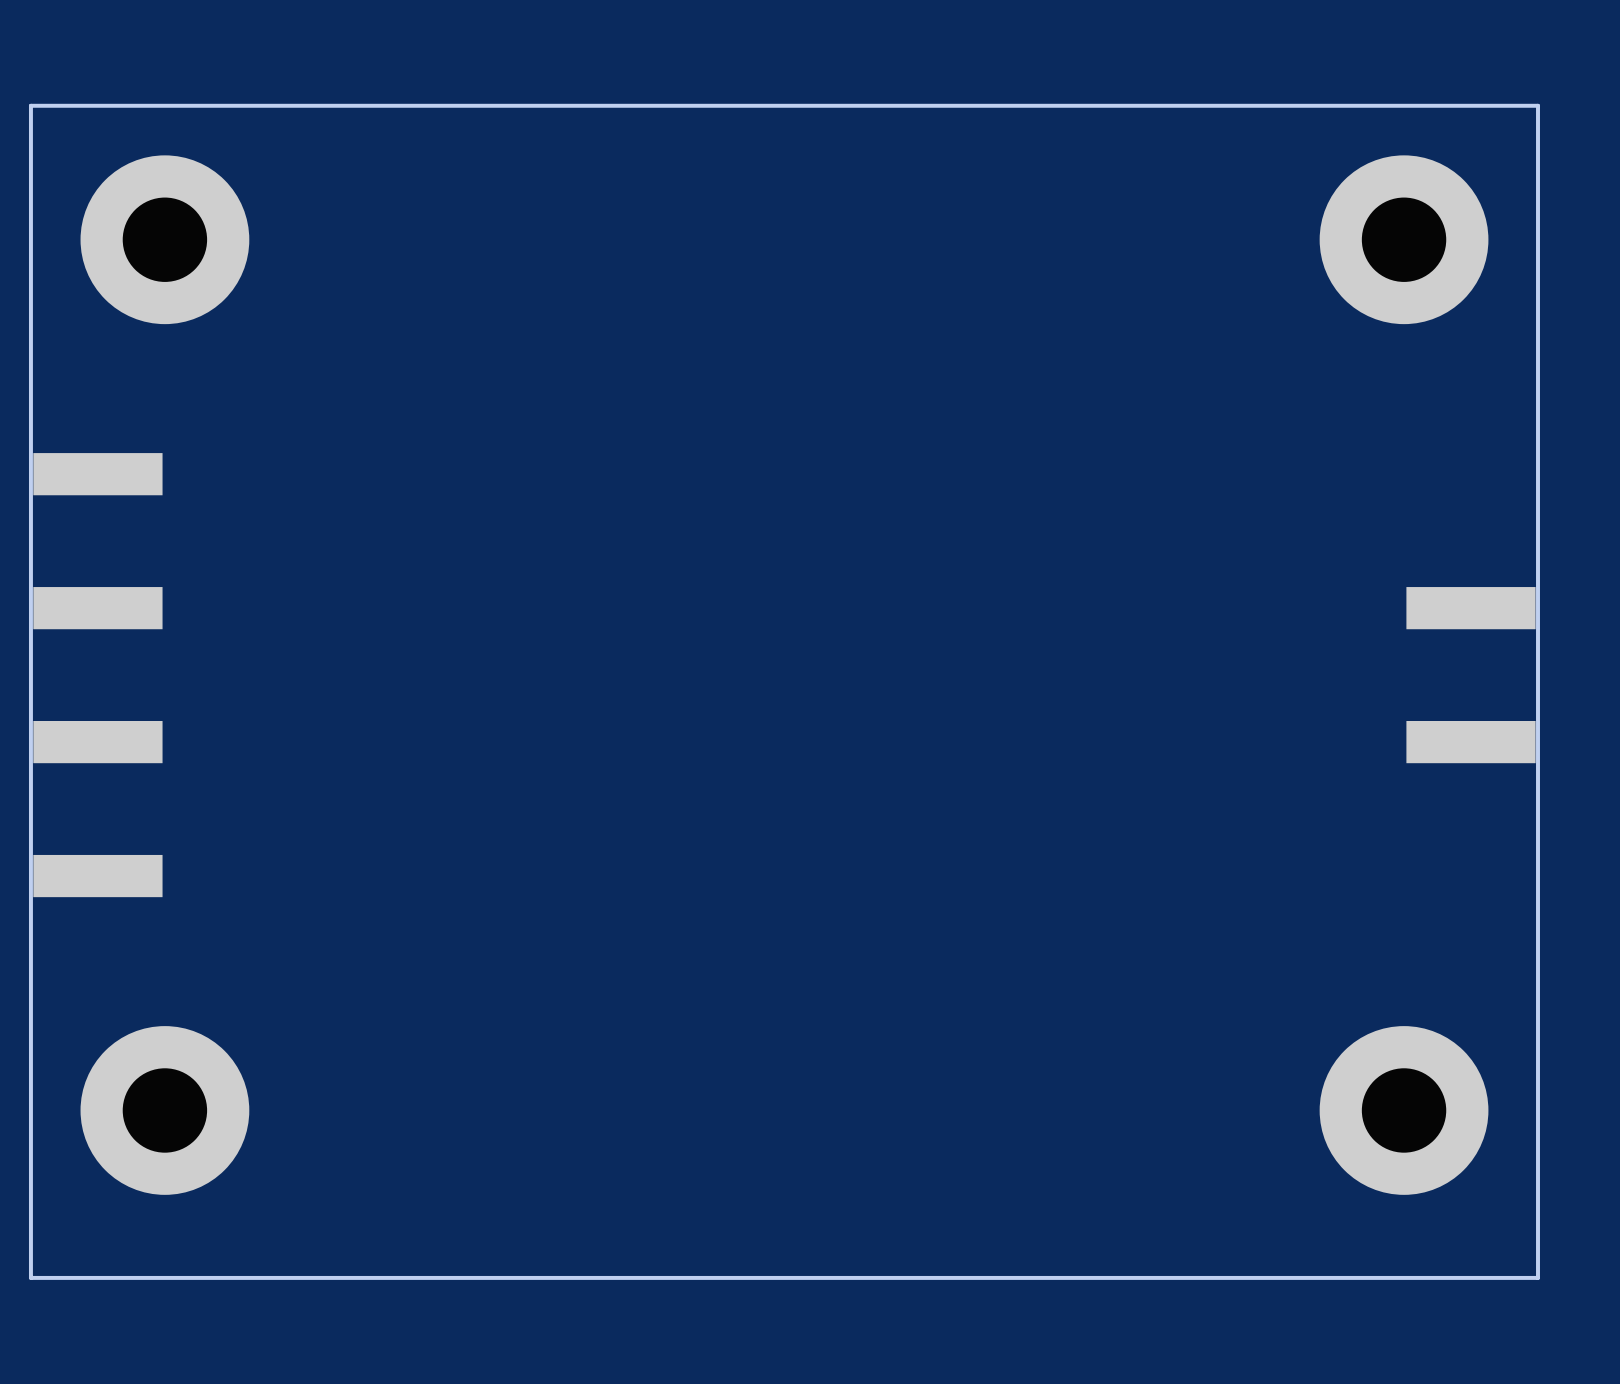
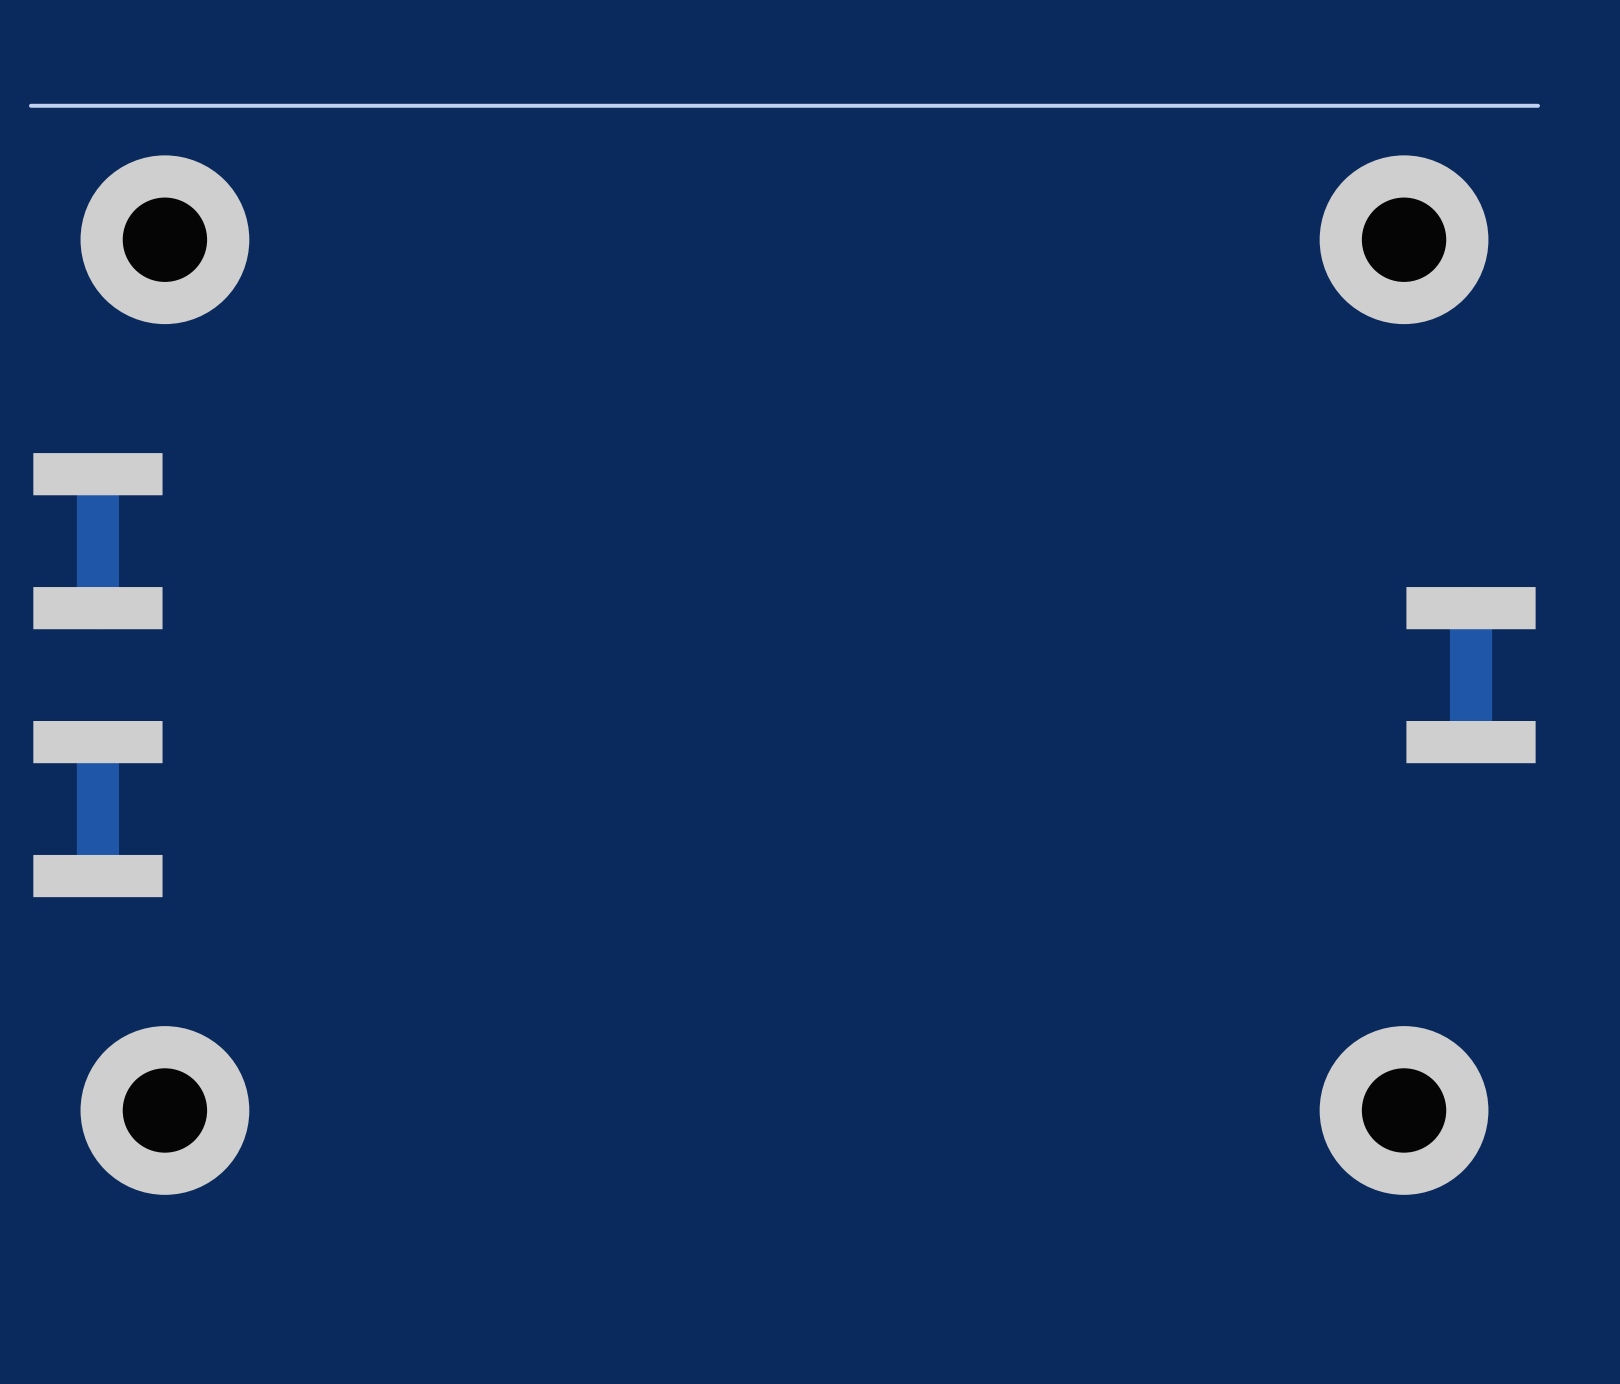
board edge: (1538, 105) (1538, 1277) (30, 1277) (30, 105) -> none
track: none -> (97, 474) (97, 608)
track: none -> (1471, 608) (1471, 742)
track: none -> (97, 742) (97, 876)

